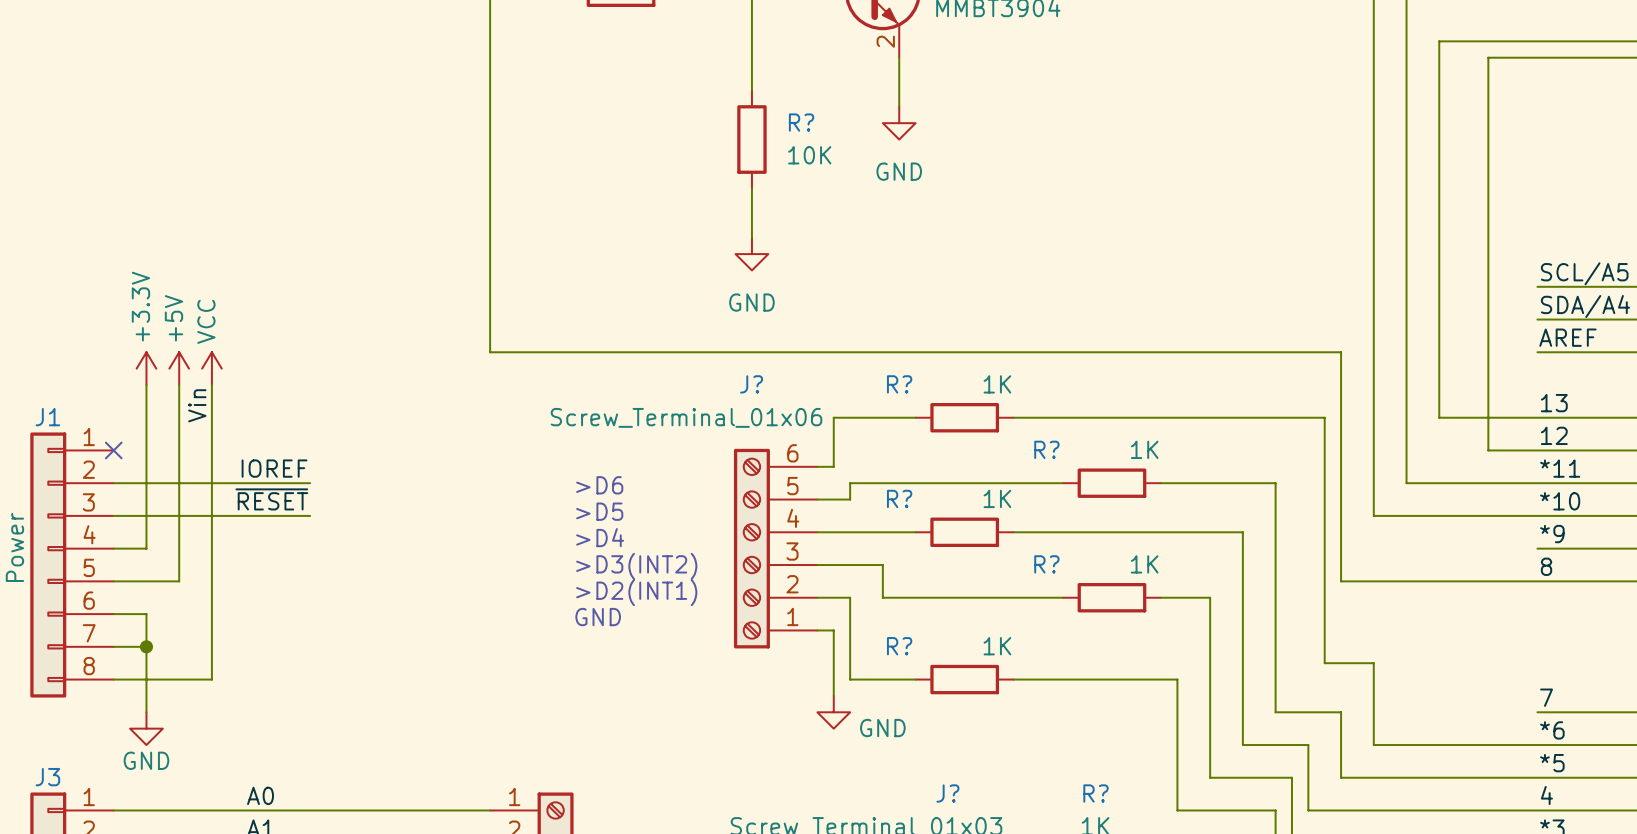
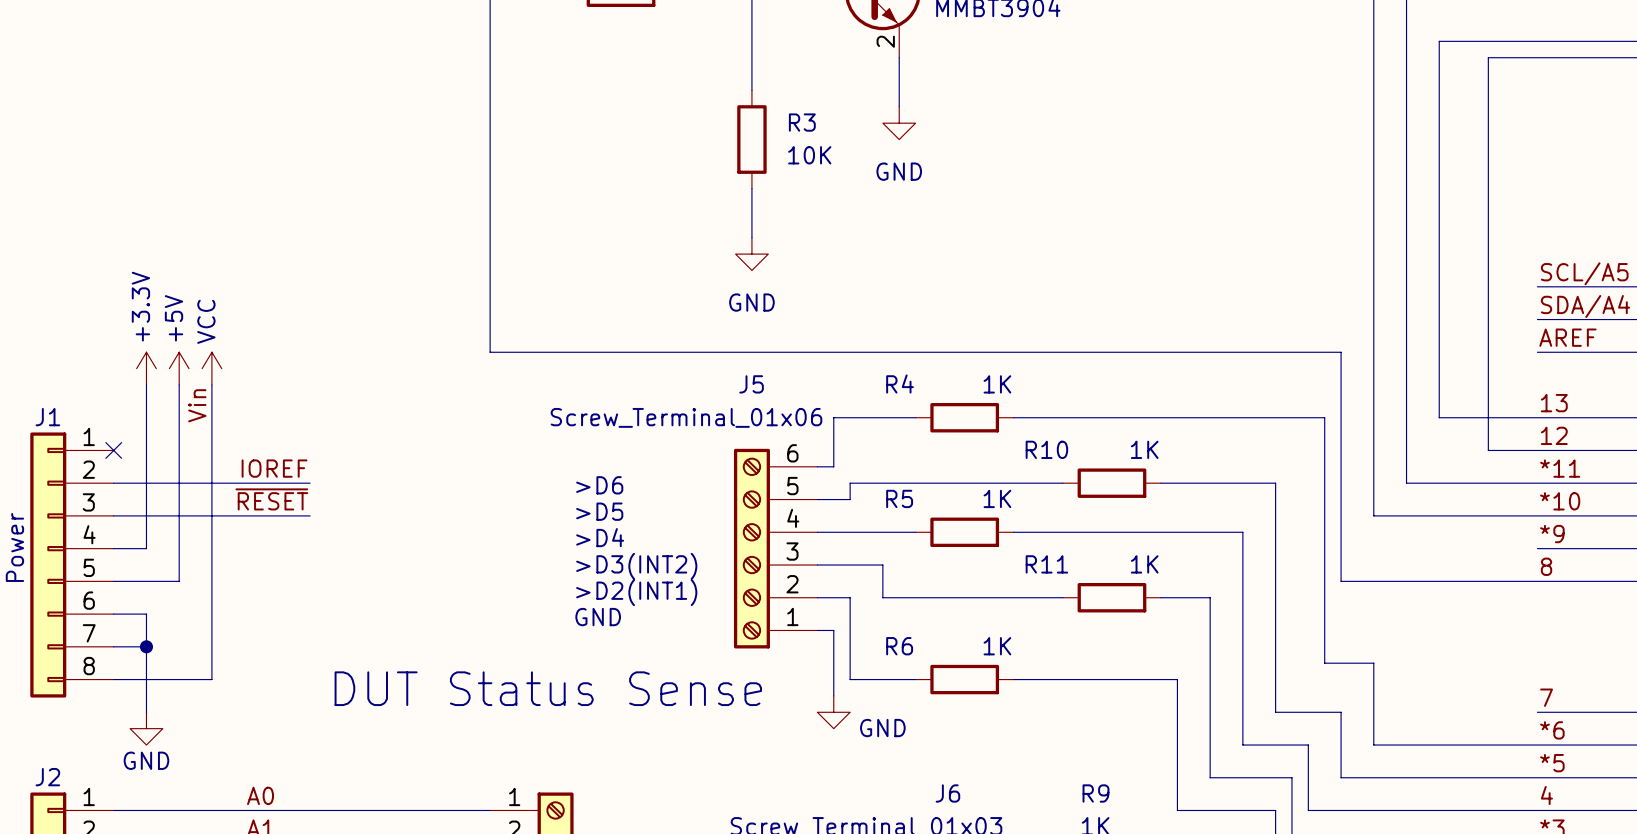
R? name: R? (801, 122) -> R3 (802, 122)
J? name: J? (751, 384) -> J5 (751, 384)
R? name: R? (899, 384) -> R4 (900, 384)
R? name: R? (1046, 449) -> R10 (1046, 449)
R? name: R? (899, 498) -> R5 (899, 498)
R? name: R? (1046, 564) -> R11 (1046, 564)
R? name: R? (899, 646) -> R6 (899, 646)
text: none -> DUT Status Sense (548, 688)
J3 name: J3 (47, 777) -> J2 (47, 777)
J? name: J? (947, 793) -> J6 (947, 793)
R? name: R? (1095, 793) -> R9 (1095, 793)

